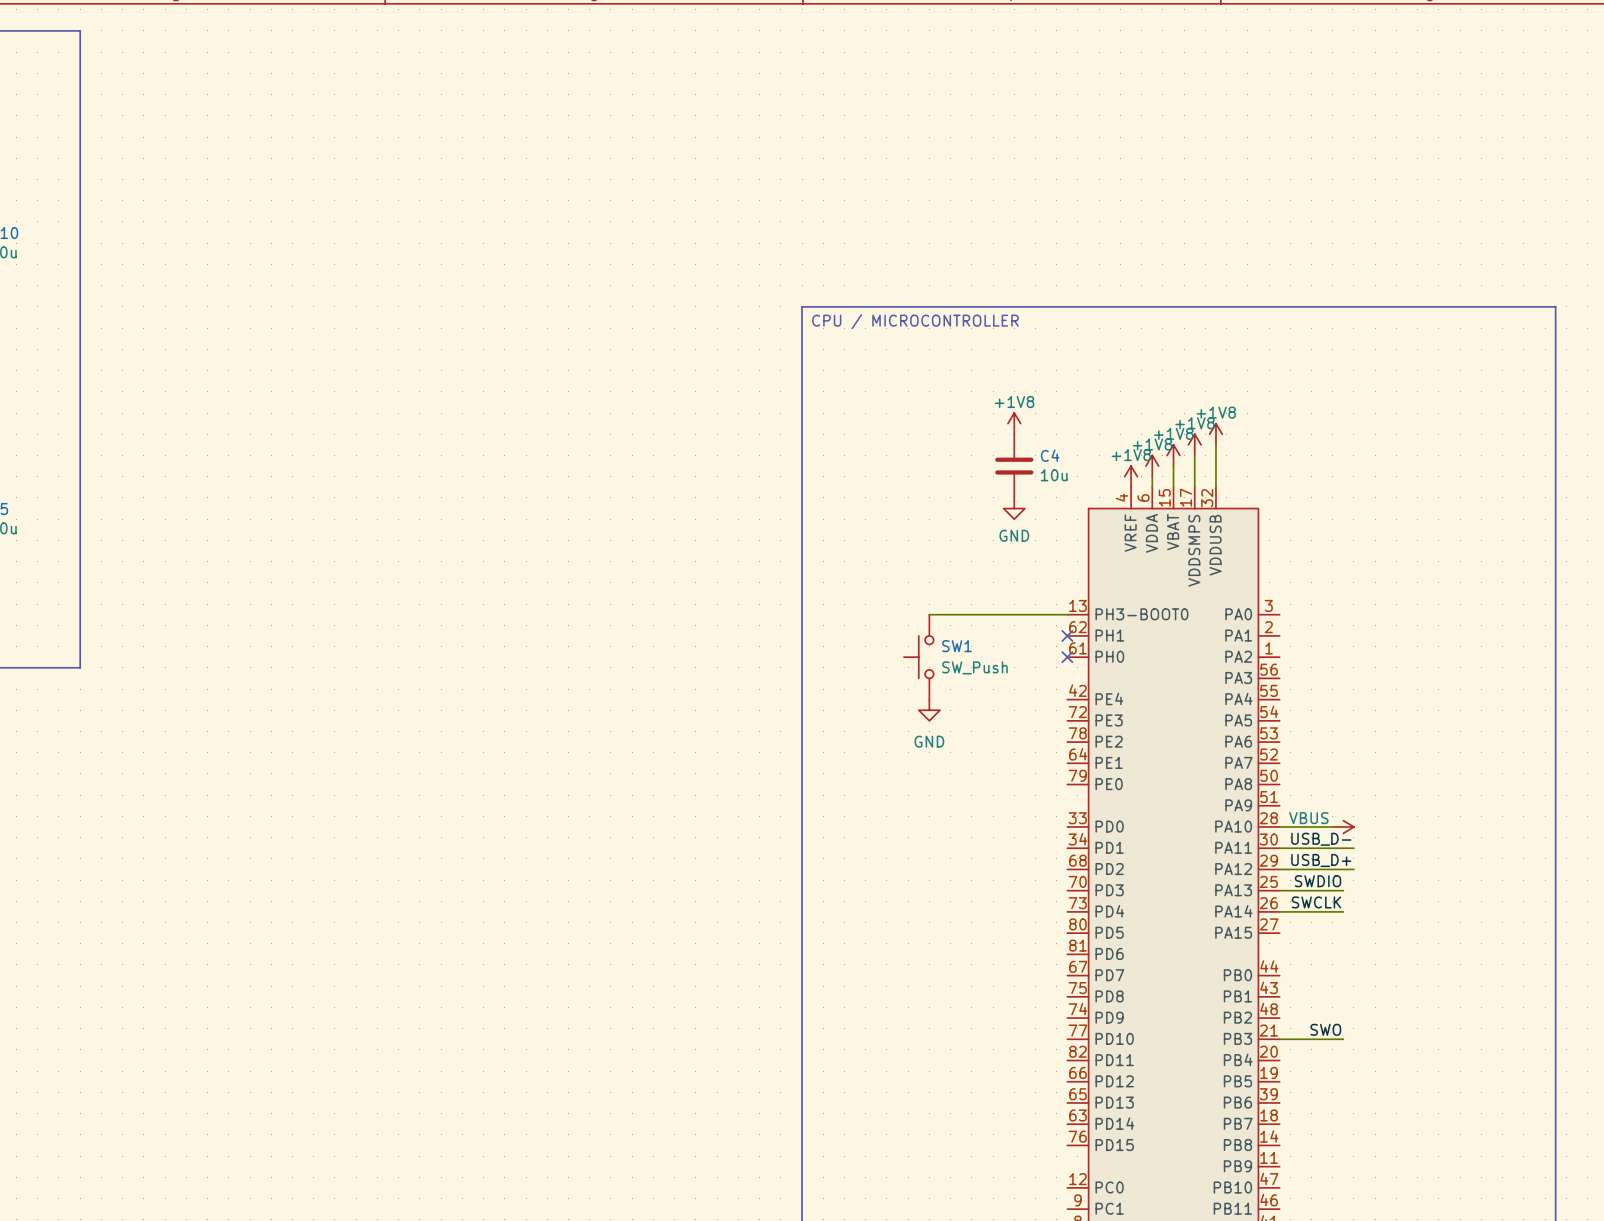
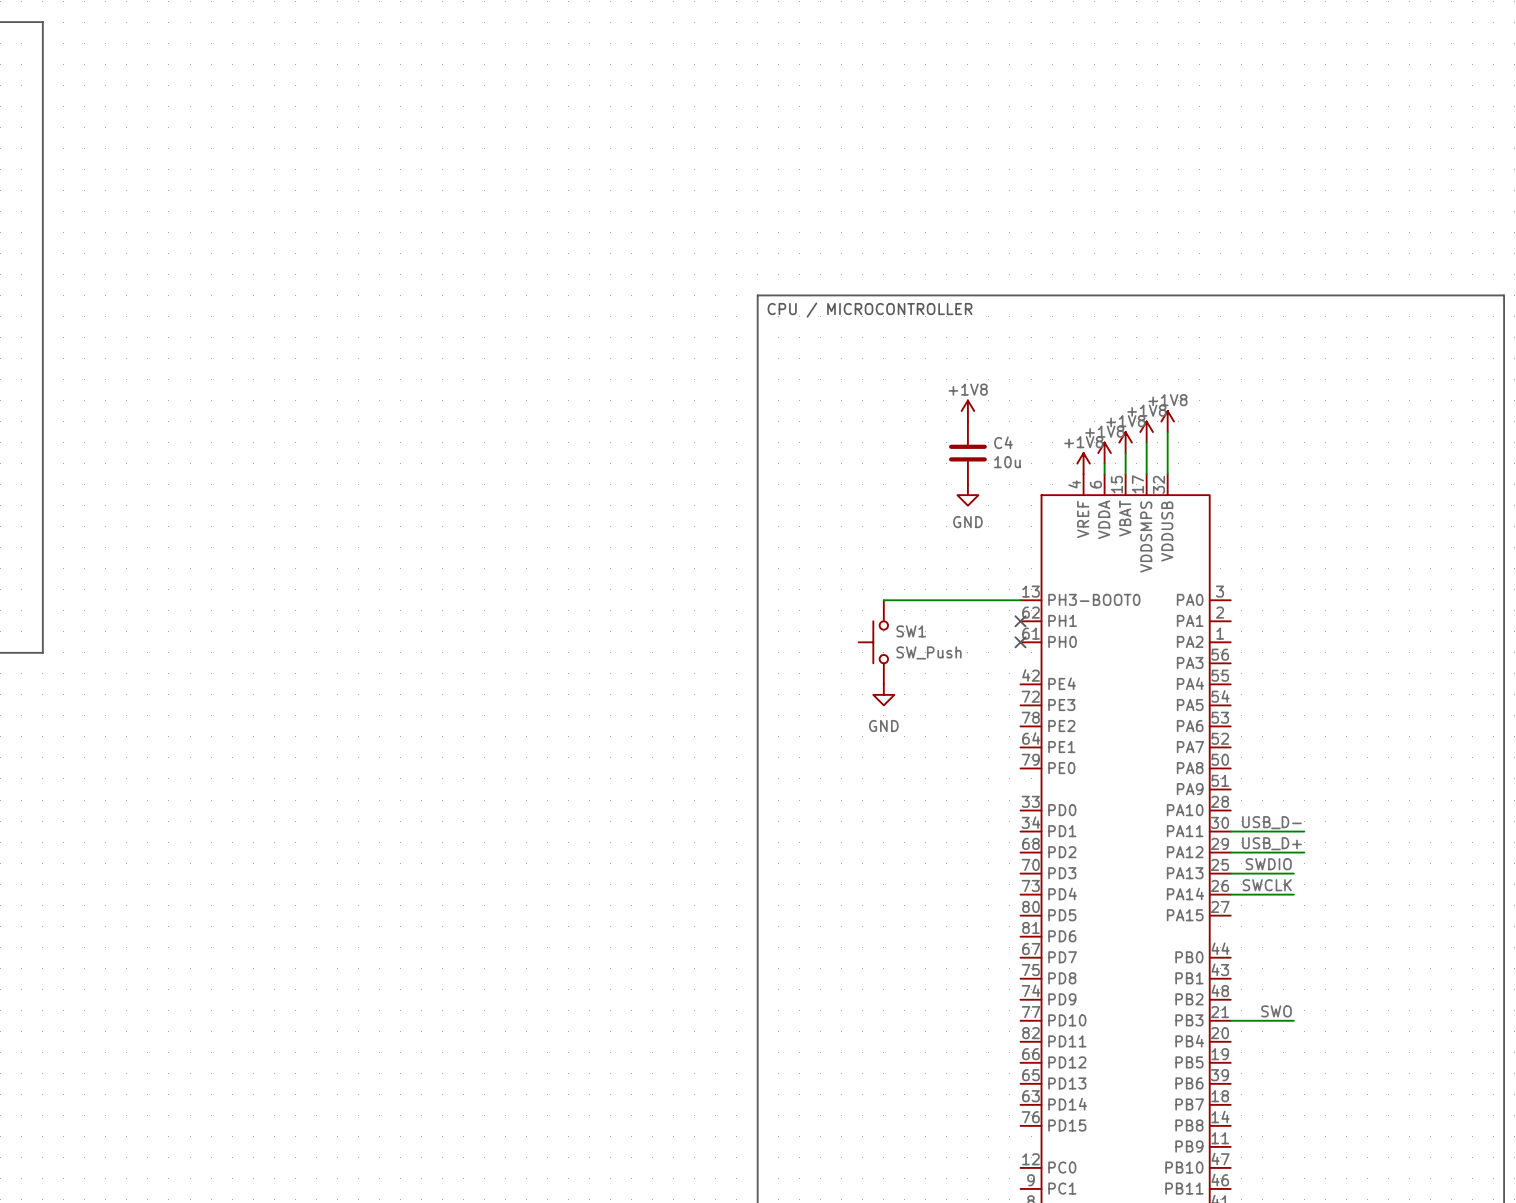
wire: (1279, 827) (1332, 827) -> none
power symbol: VBUS (1343, 827) -> none

